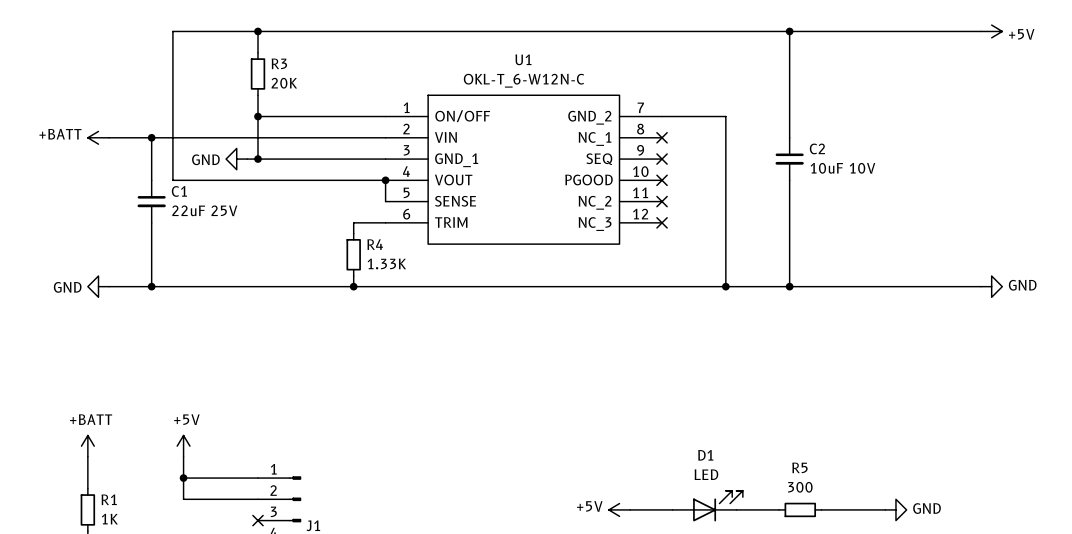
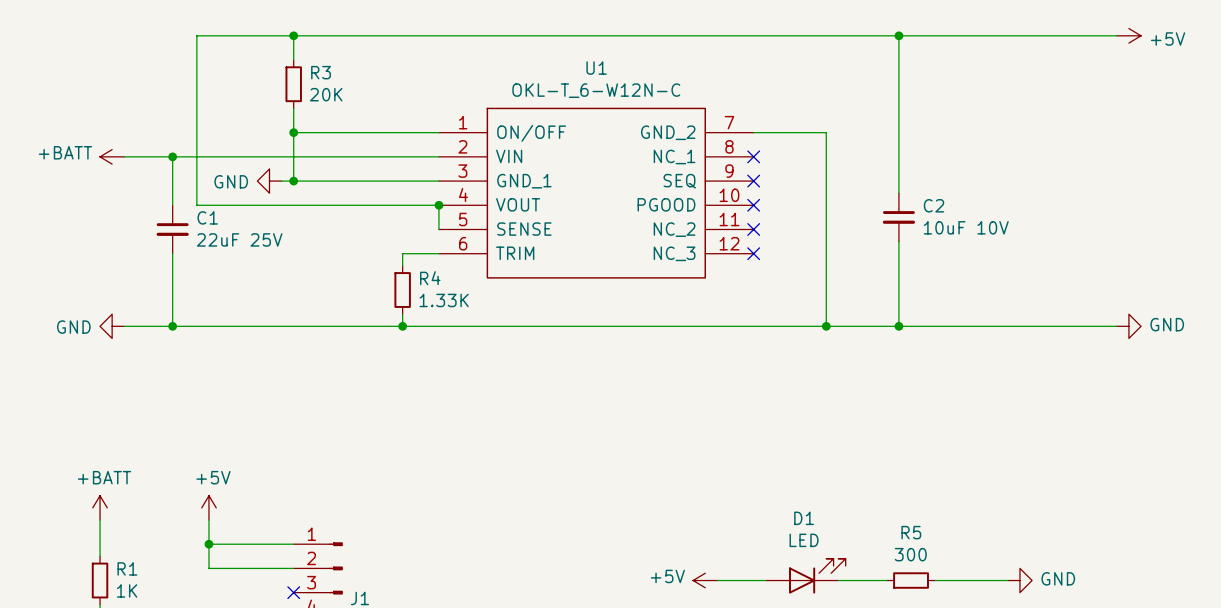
C2 position: (789, 159) -> (898, 217)

